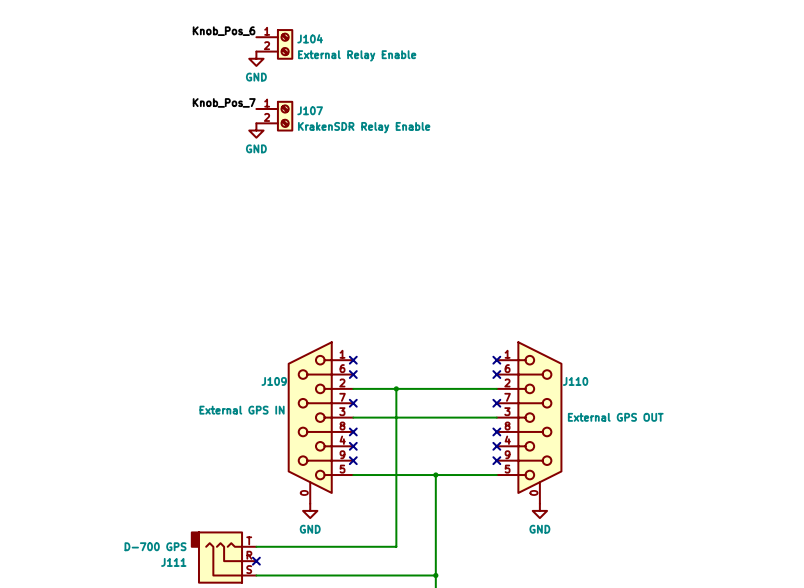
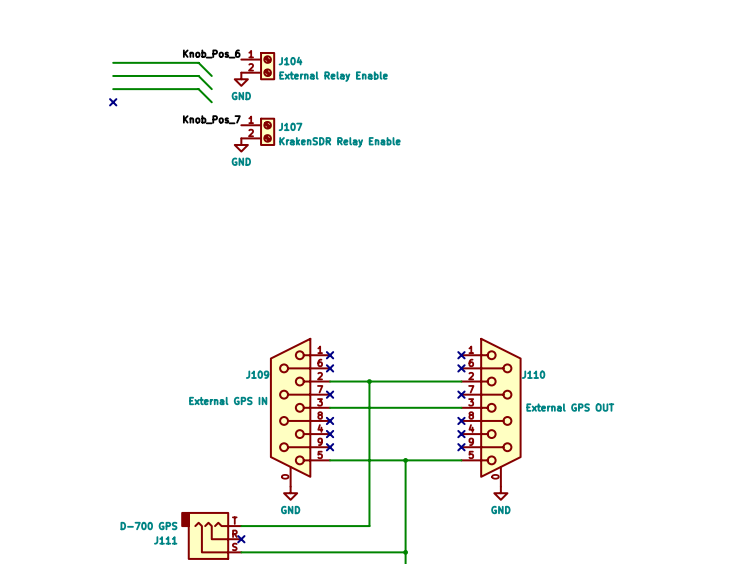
wire: none -> (113, 62) (198, 62) (211, 75)
wire: none -> (113, 75) (198, 75) (211, 89)
wire: none -> (113, 89) (198, 89) (211, 102)
no-connect mark: none -> (113, 102)

